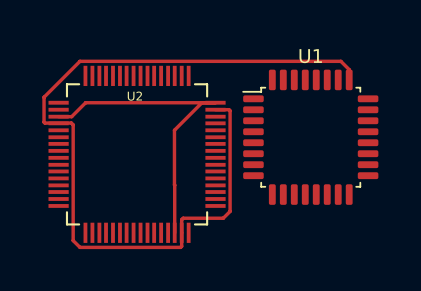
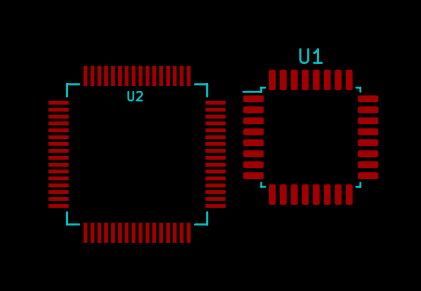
track: (349, 79) (349, 69) (340, 61) (79, 61) (44, 97) (44, 123) (71, 123) (73, 124) (73, 240) (79, 247) (180, 247) (183, 218) (223, 218) (230, 211) (230, 110) (215, 109) -> none
track: (201, 102) (174, 130) (174, 232) -> none
track: (215, 102) (85, 102) (71, 116) (58, 116) -> none

